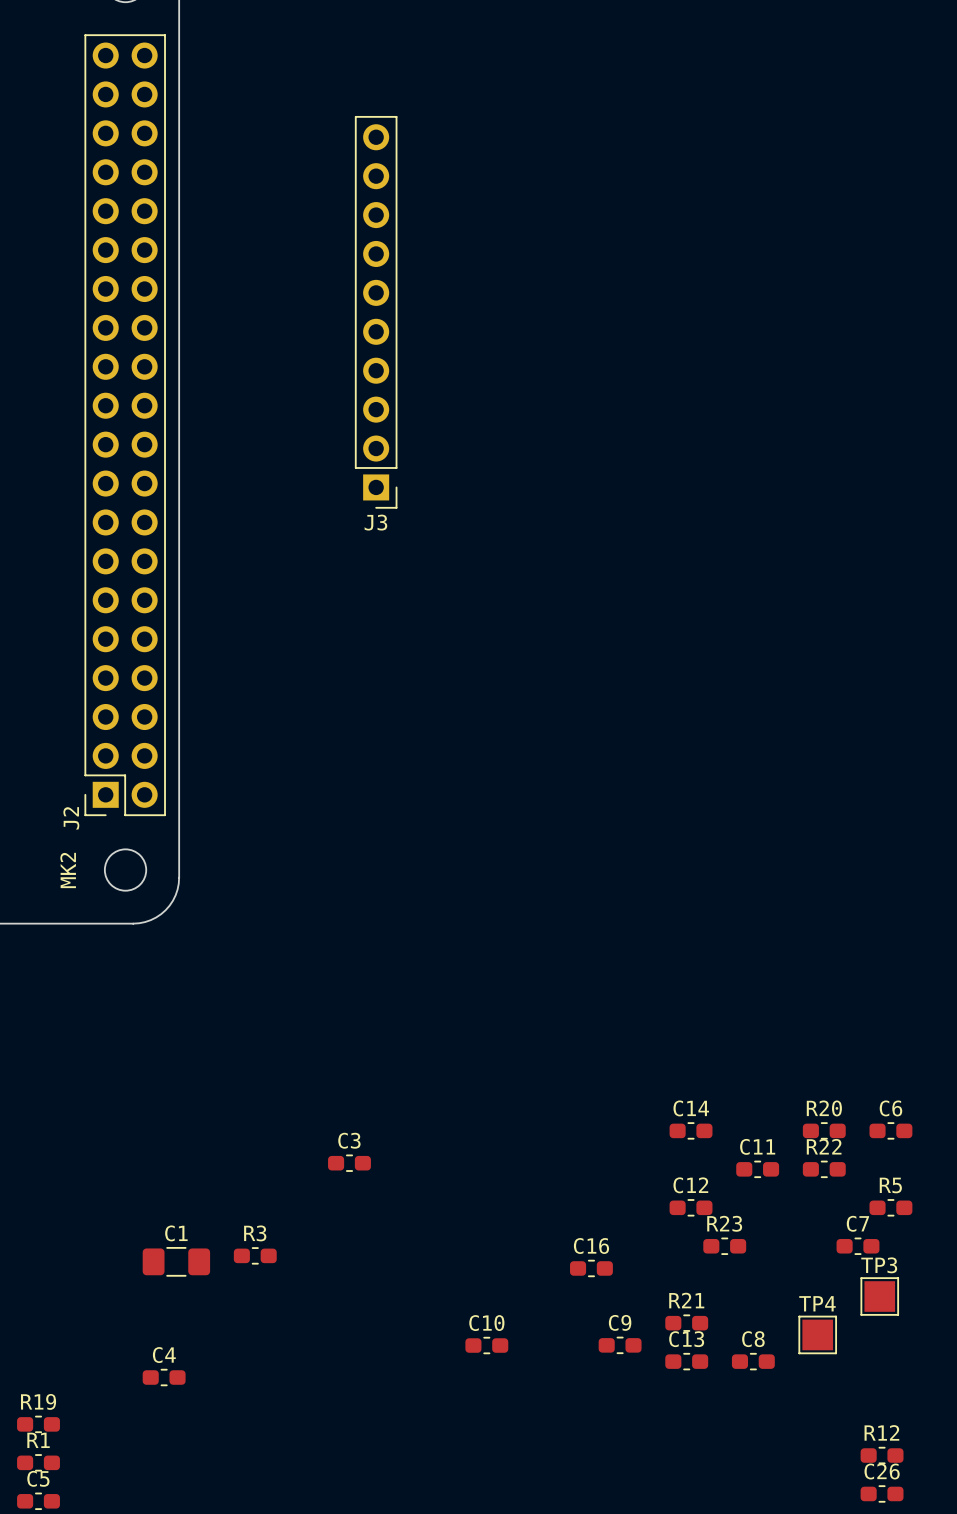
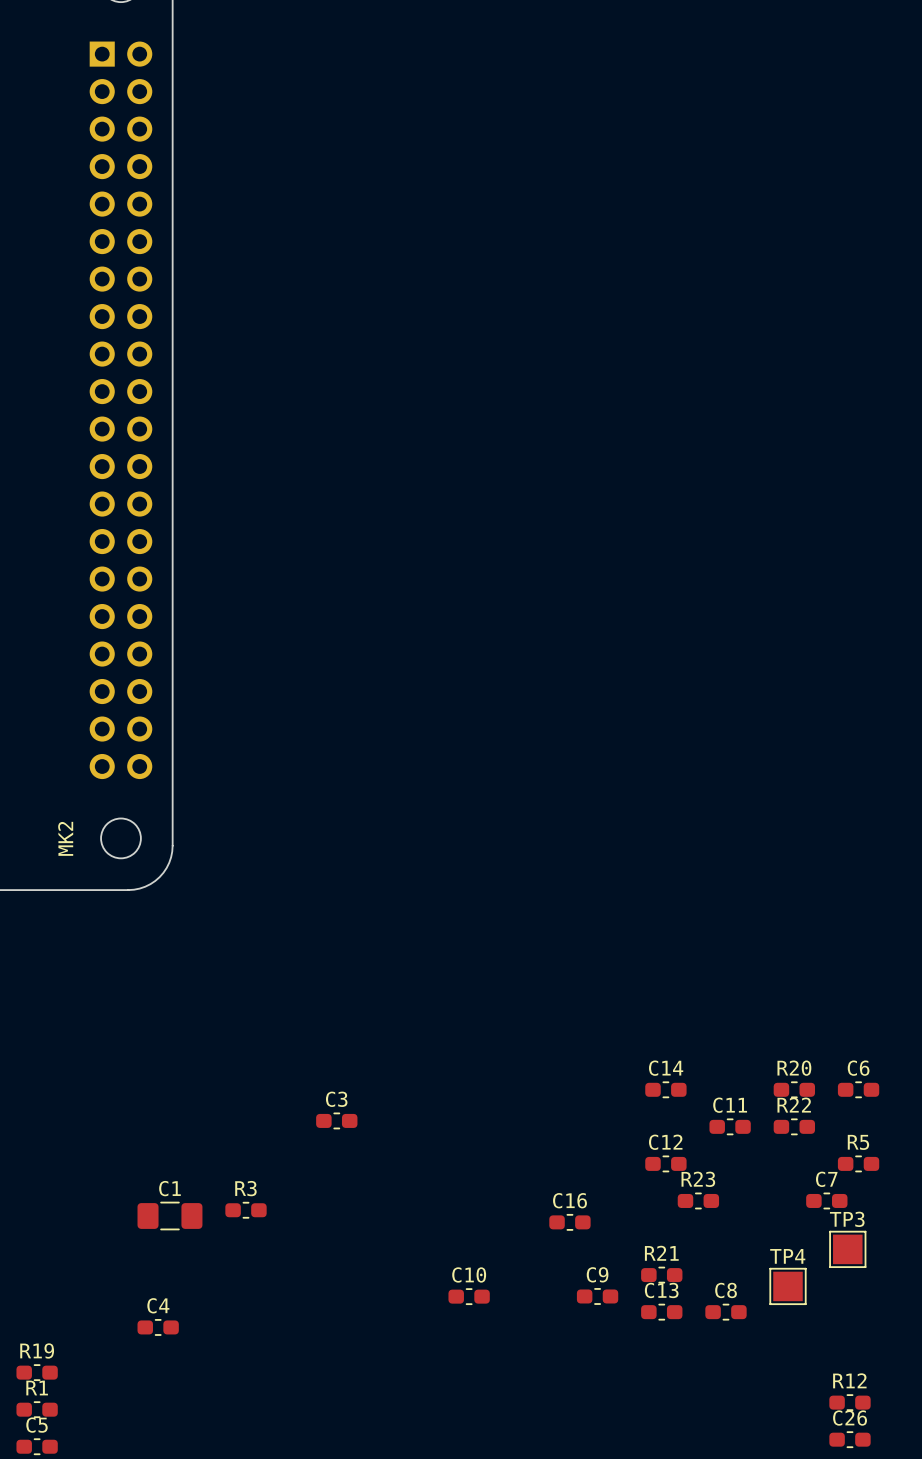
J3: (376, 312) -> none
J2 side: top (125, 425) -> bottom (120, 410)

